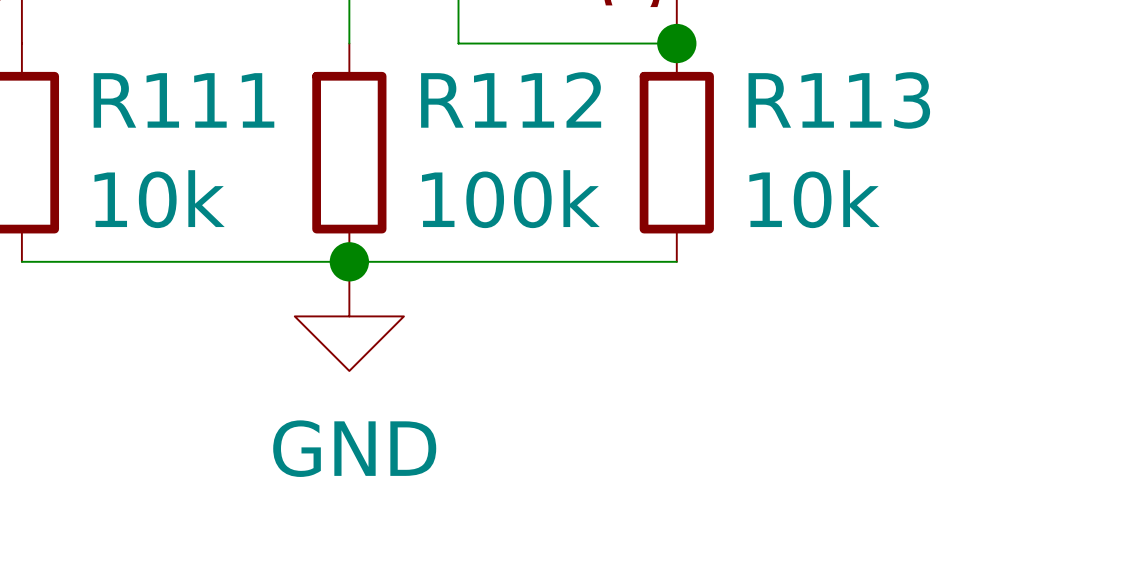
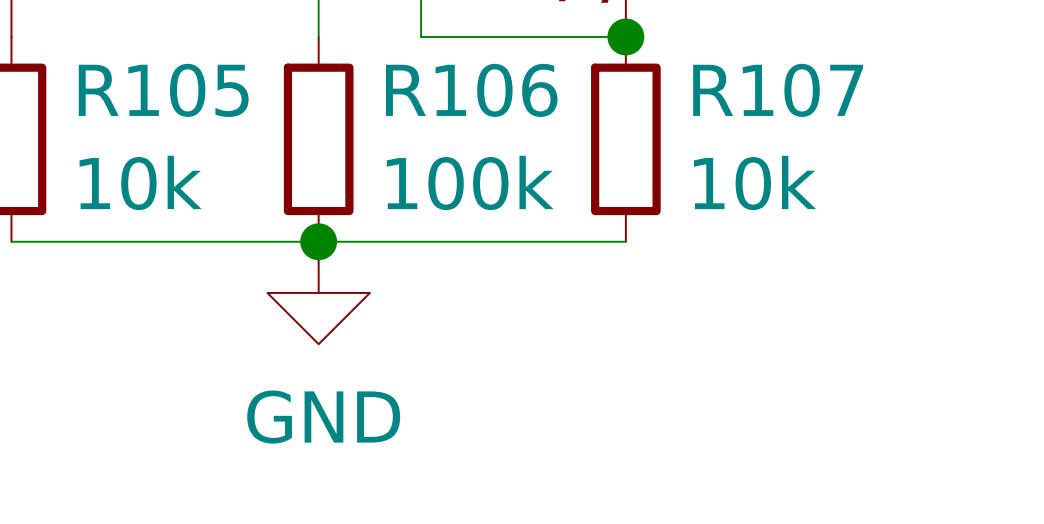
R112 name: R112 (511, 99) -> R106 (471, 90)
R111 name: R111 (183, 100) -> R105 (163, 90)
R113 name: R113 (839, 100) -> R107 (778, 90)

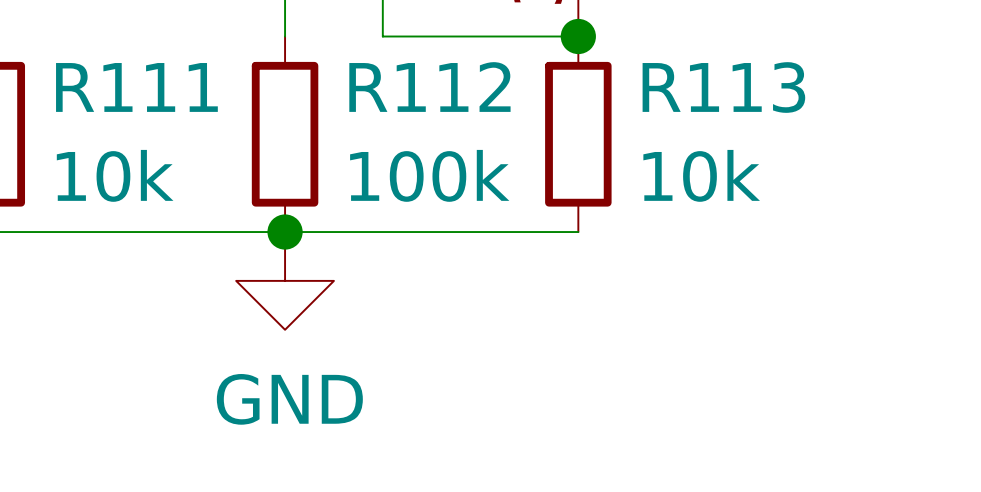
R105 name: R105 (163, 90) -> R111 (136, 87)
R106 name: R106 (471, 90) -> R112 (429, 87)
R107 name: R107 (778, 90) -> R113 (723, 87)

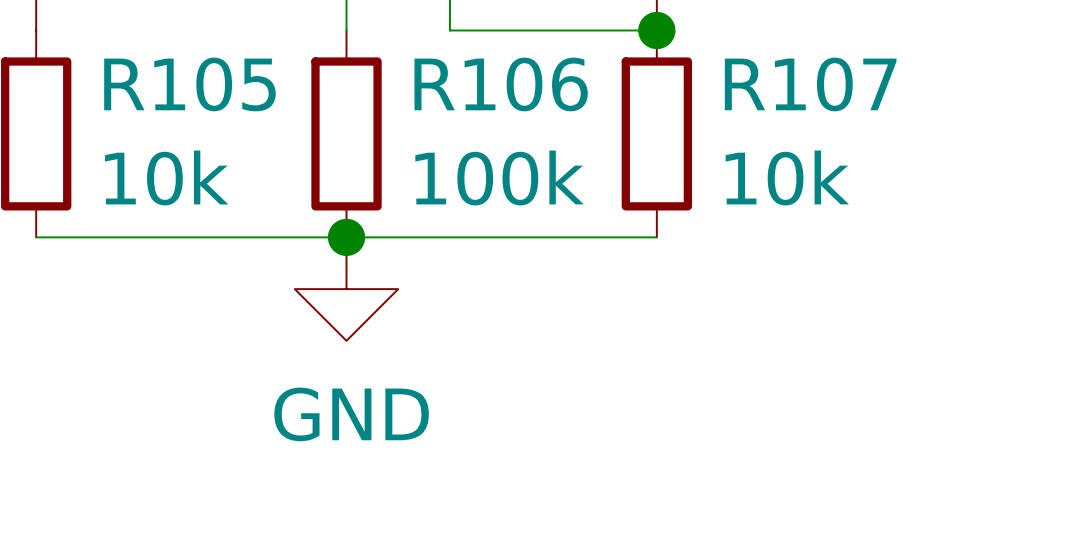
R111 name: R111 (136, 87) -> R105 (189, 84)
R112 name: R112 (429, 87) -> R106 (501, 84)
R113 name: R113 (723, 87) -> R107 (810, 84)

